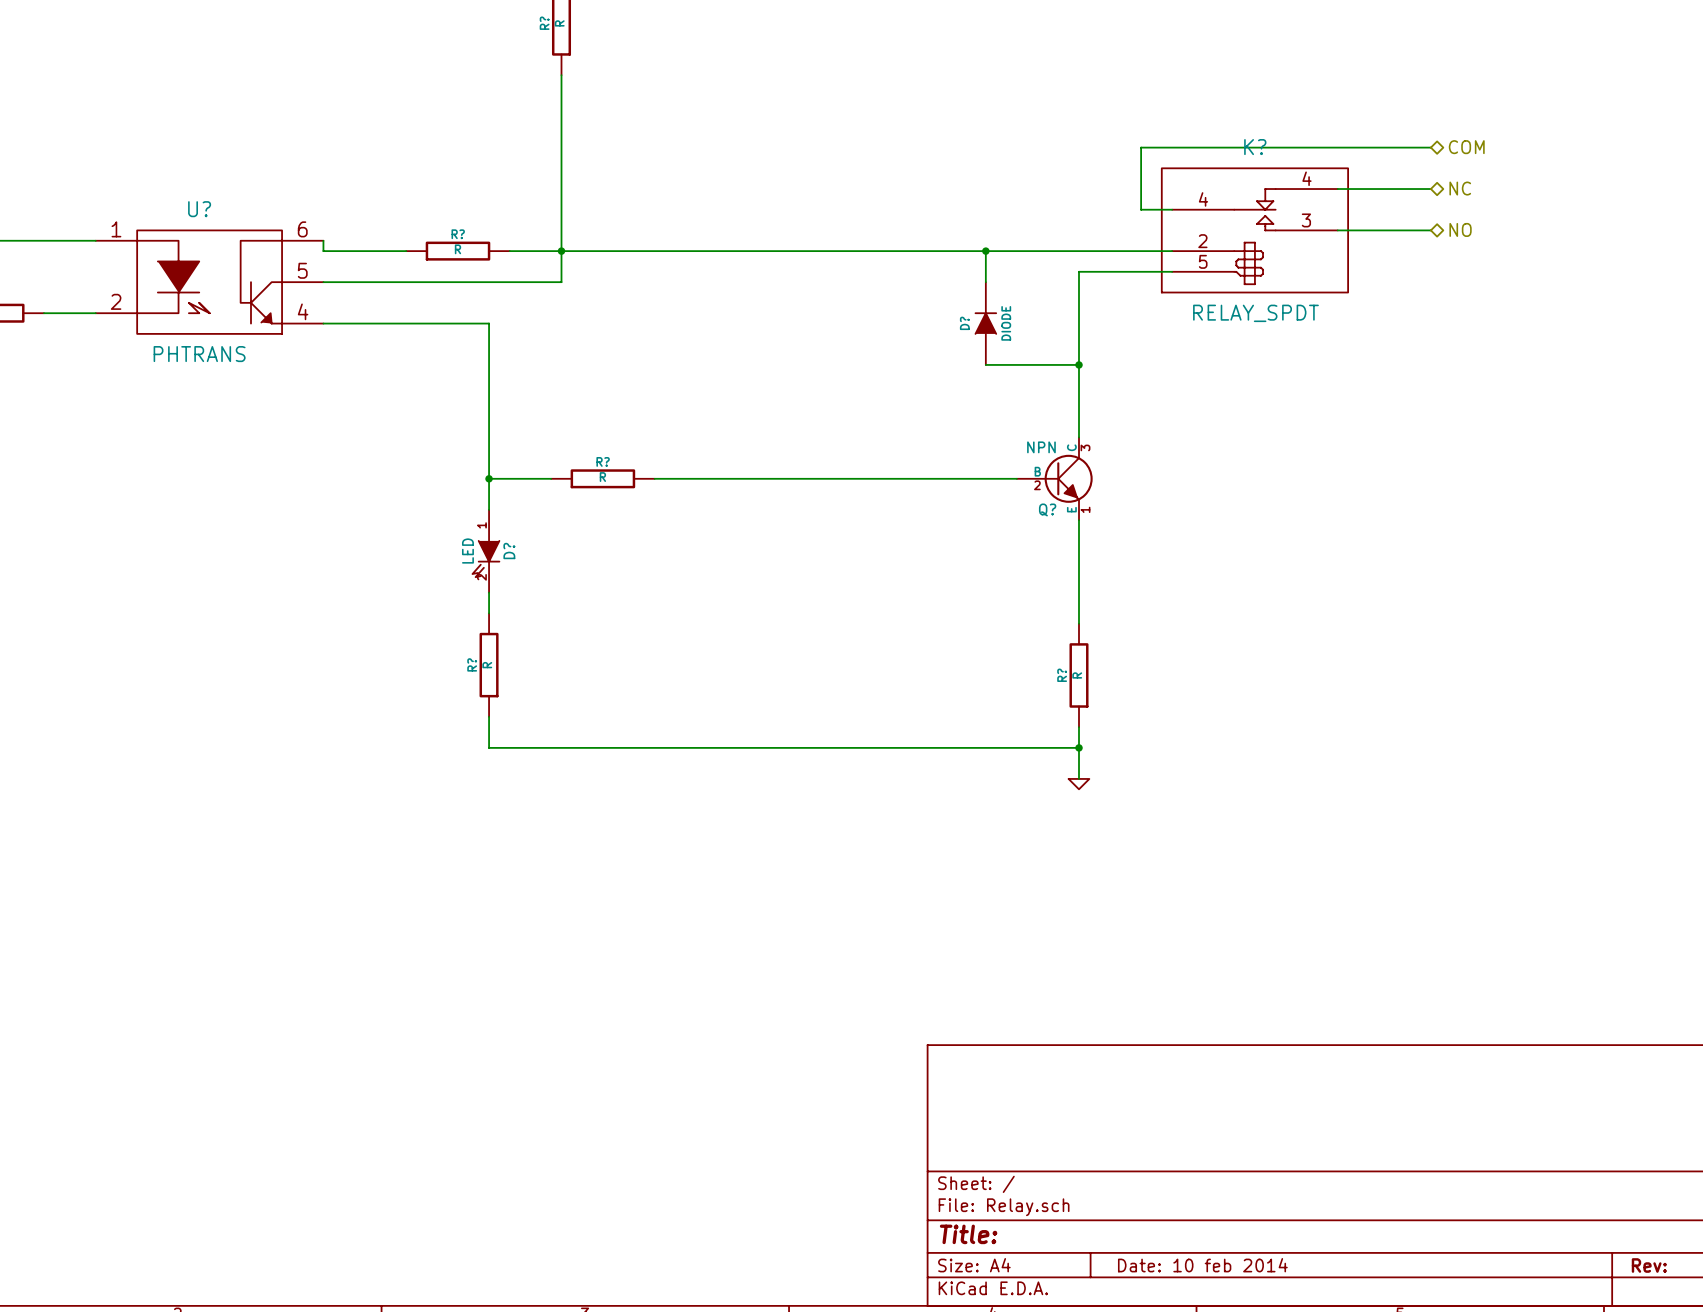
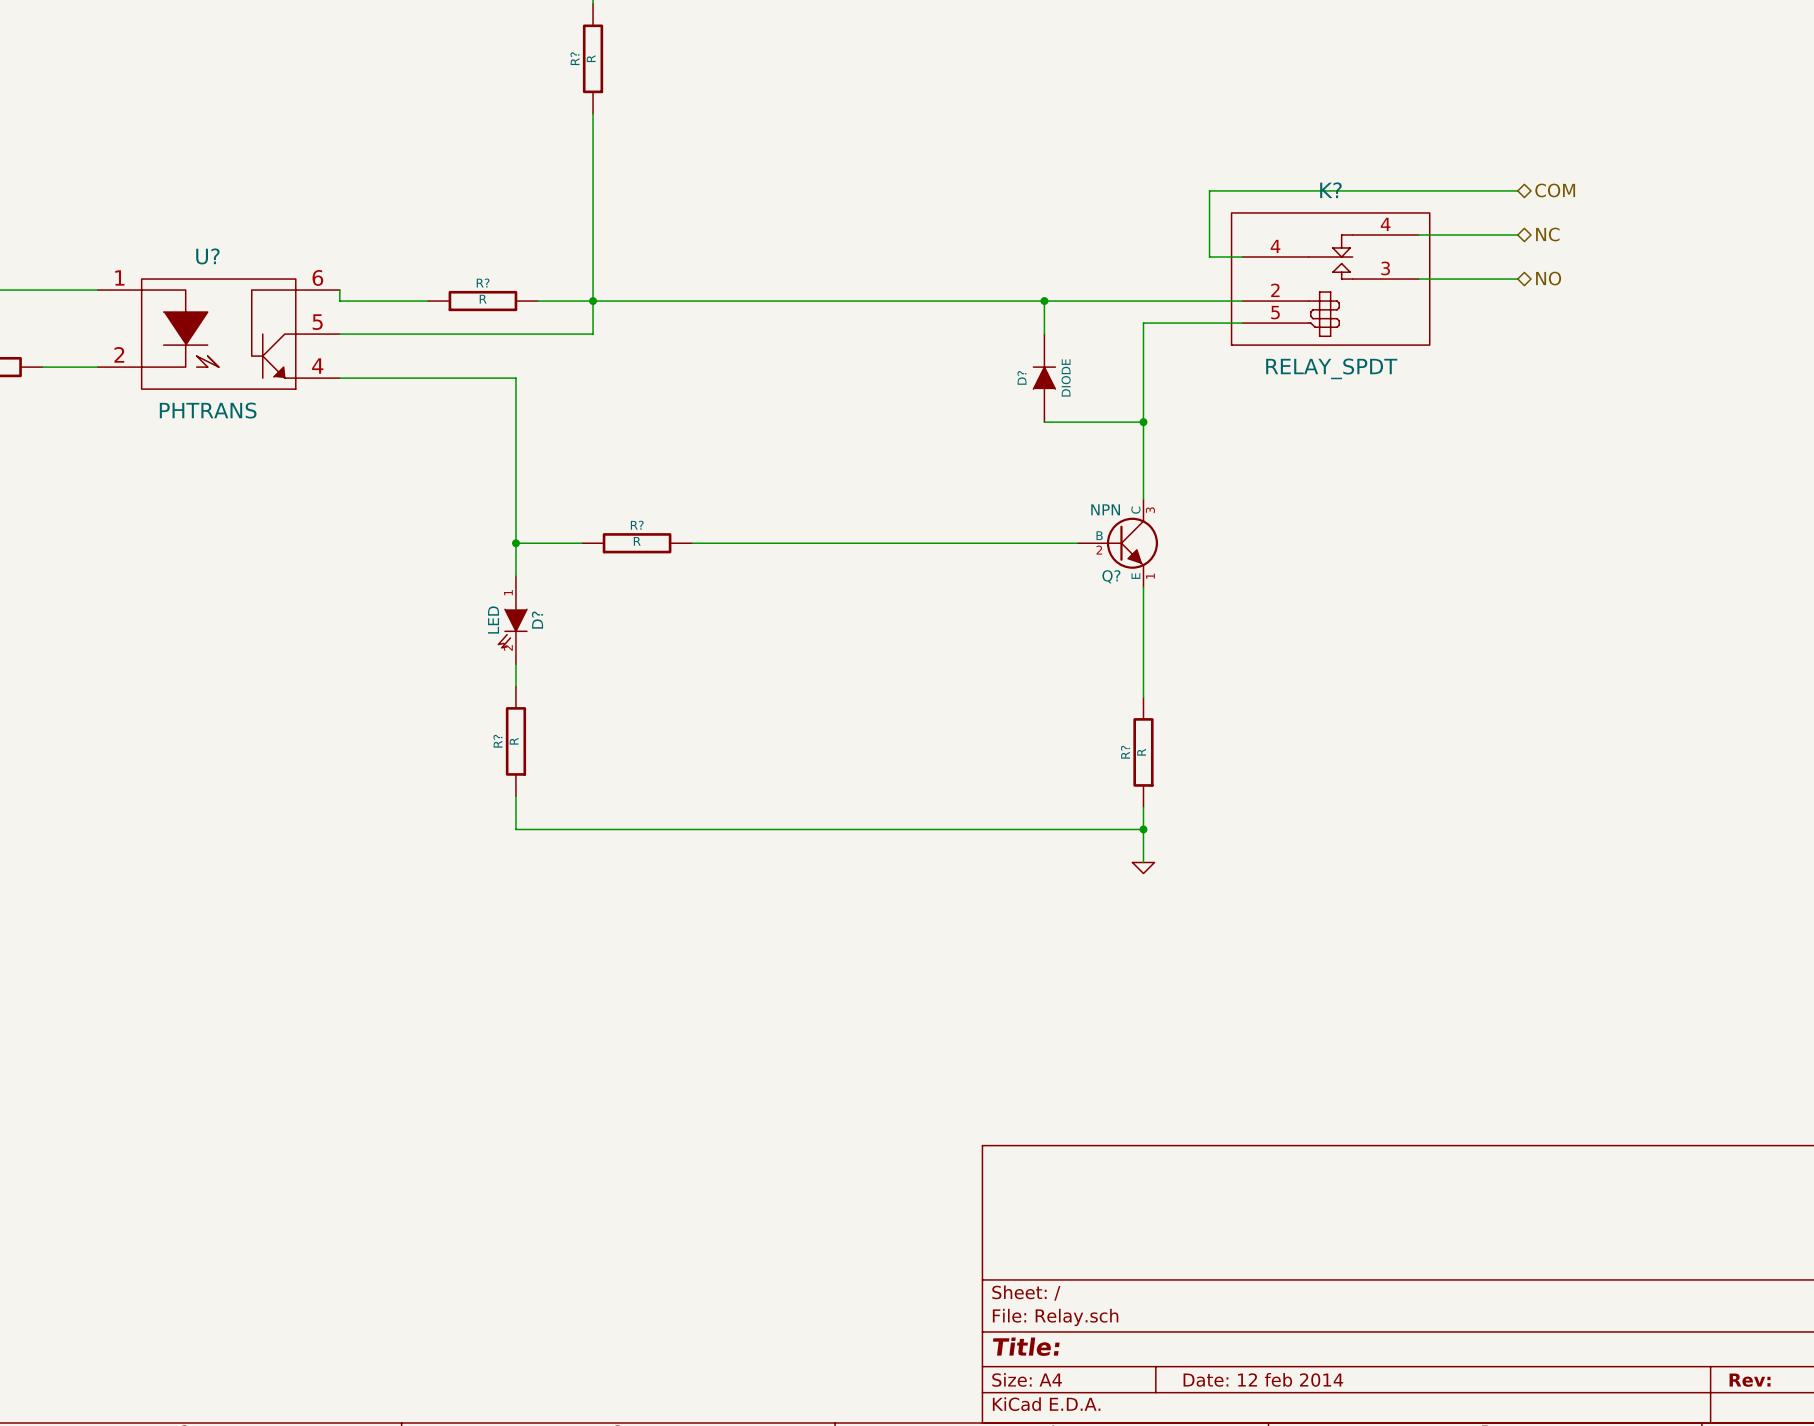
title block: Date: 10 feb 2014 (1202, 1265) -> Date: 12 feb 2014 (1263, 1379)

